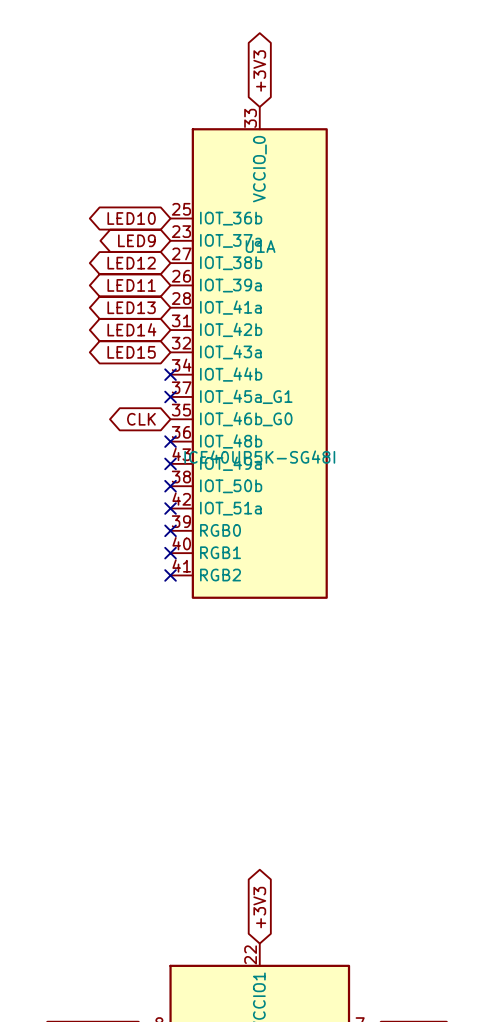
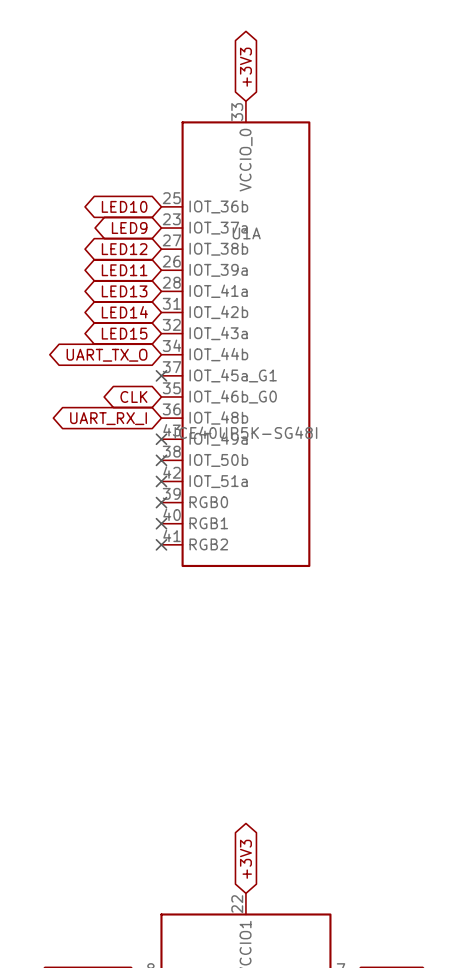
no-connect mark: (170, 374) -> none
global label: none -> UART_TX_O (107, 355)
no-connect mark: (170, 441) -> none
global label: none -> UART_RX_I (108, 418)

